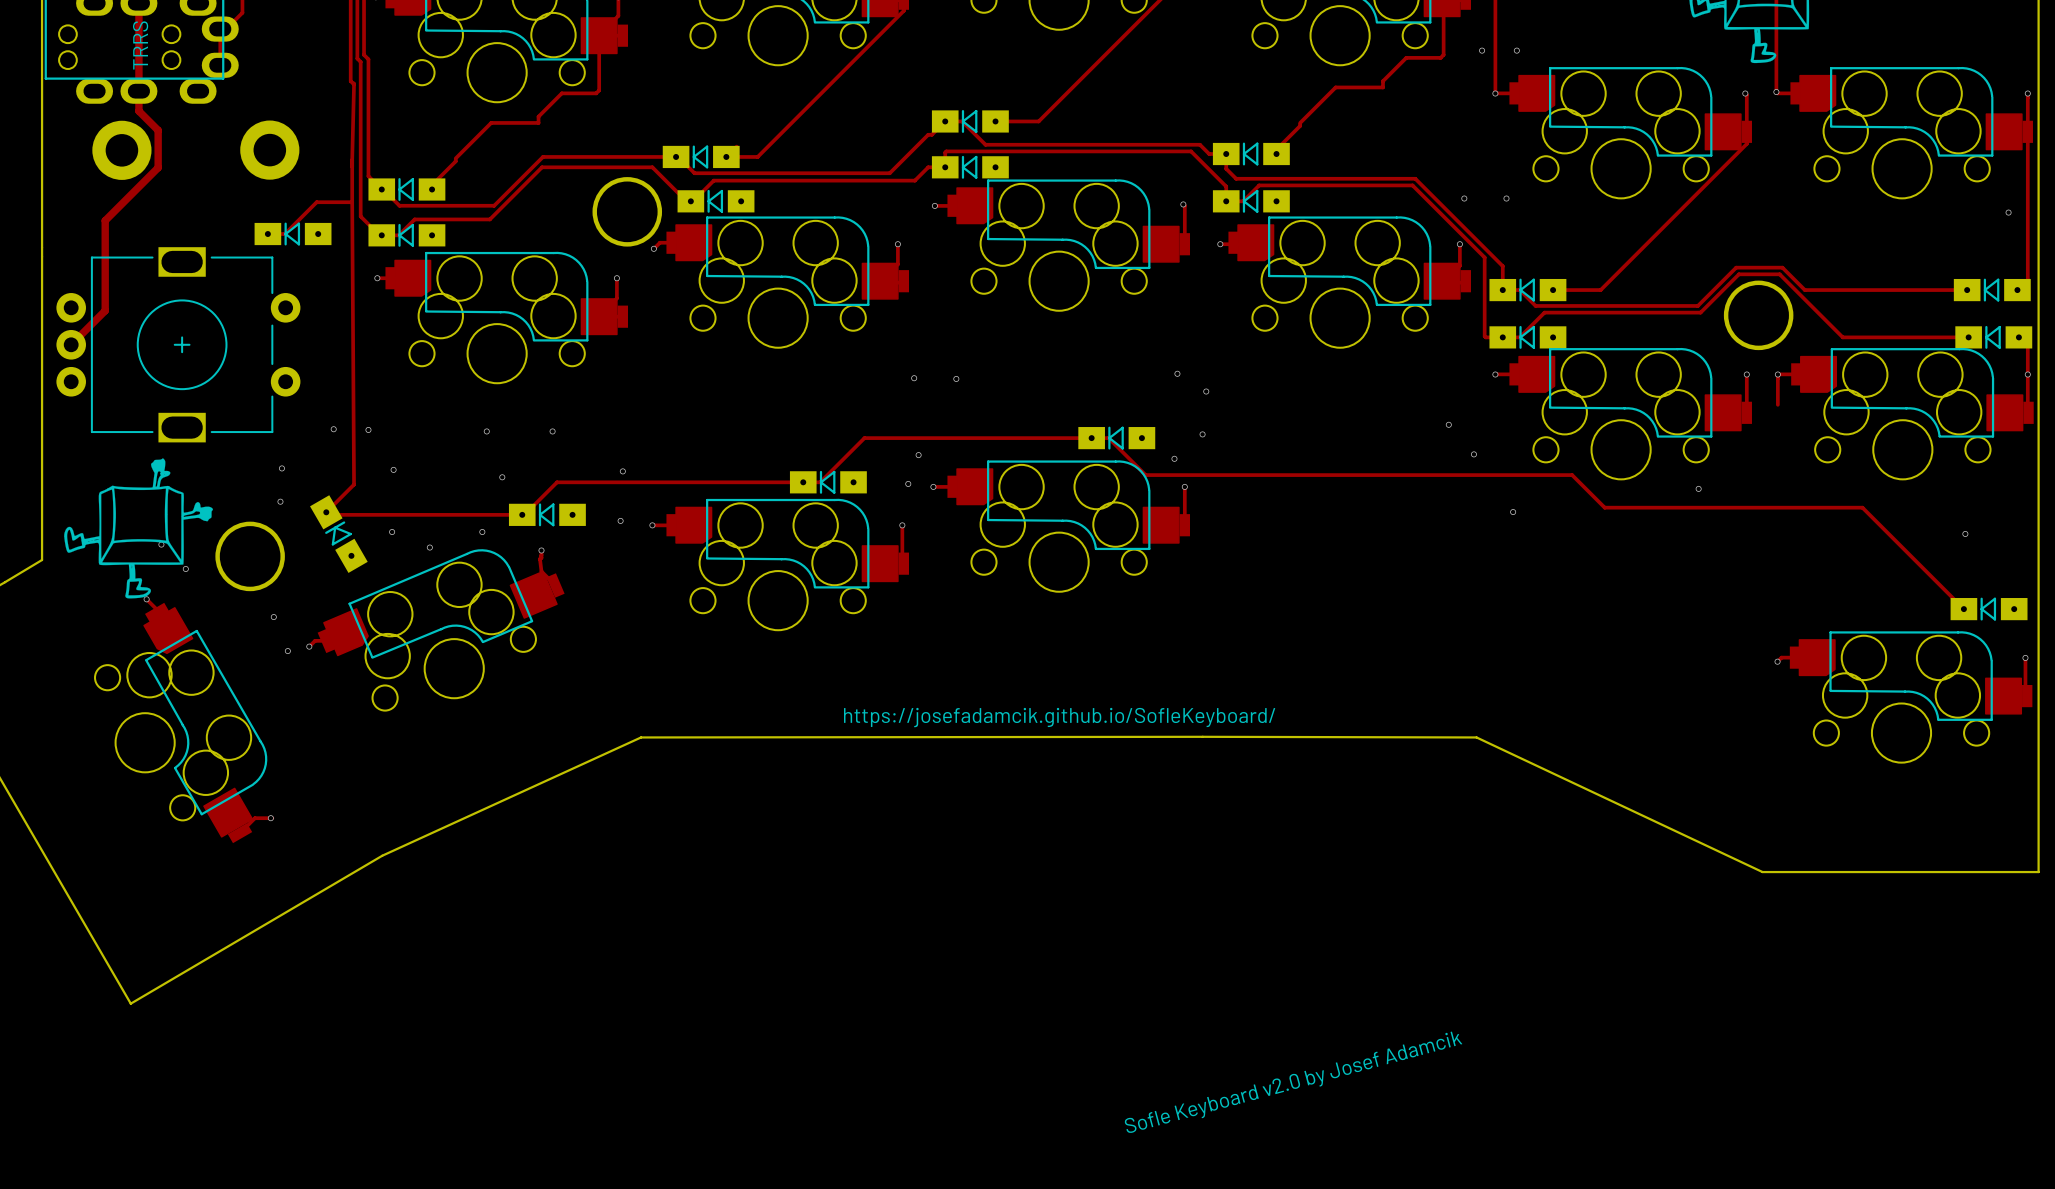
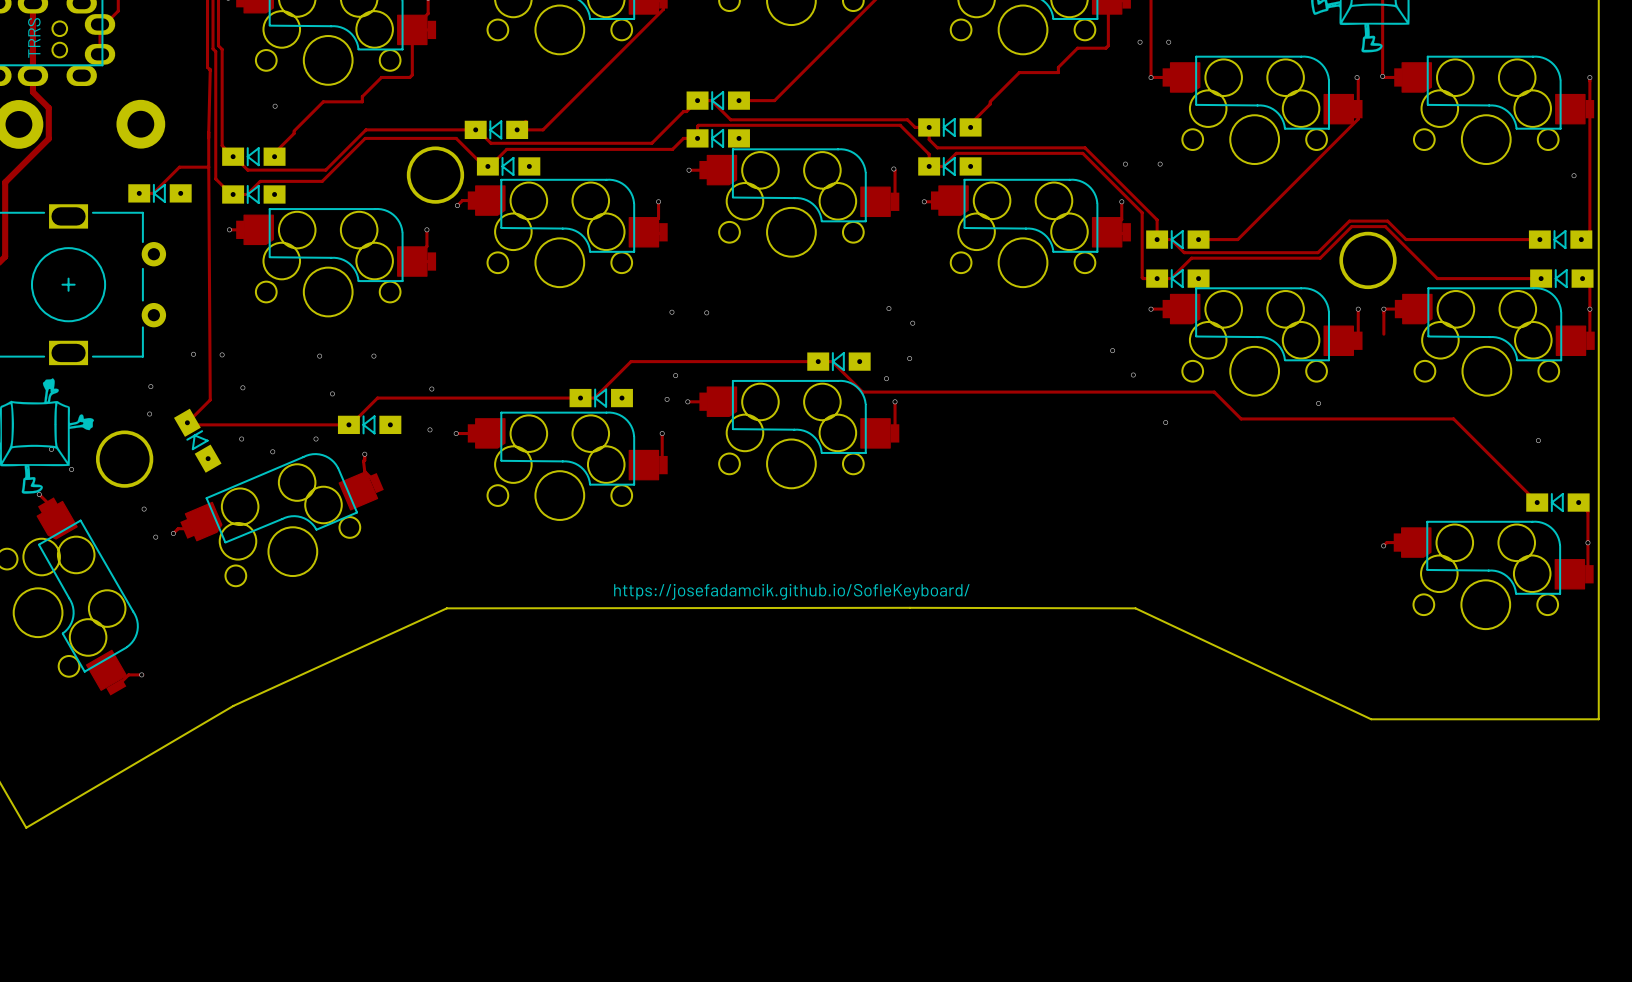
via: none -> (275, 106)
track: none -> (1578, 502) (1587, 511) (1587, 542)
text: Sofle Keyboard v2.0 by Josef Adamcik (1293, 1082) -> none

